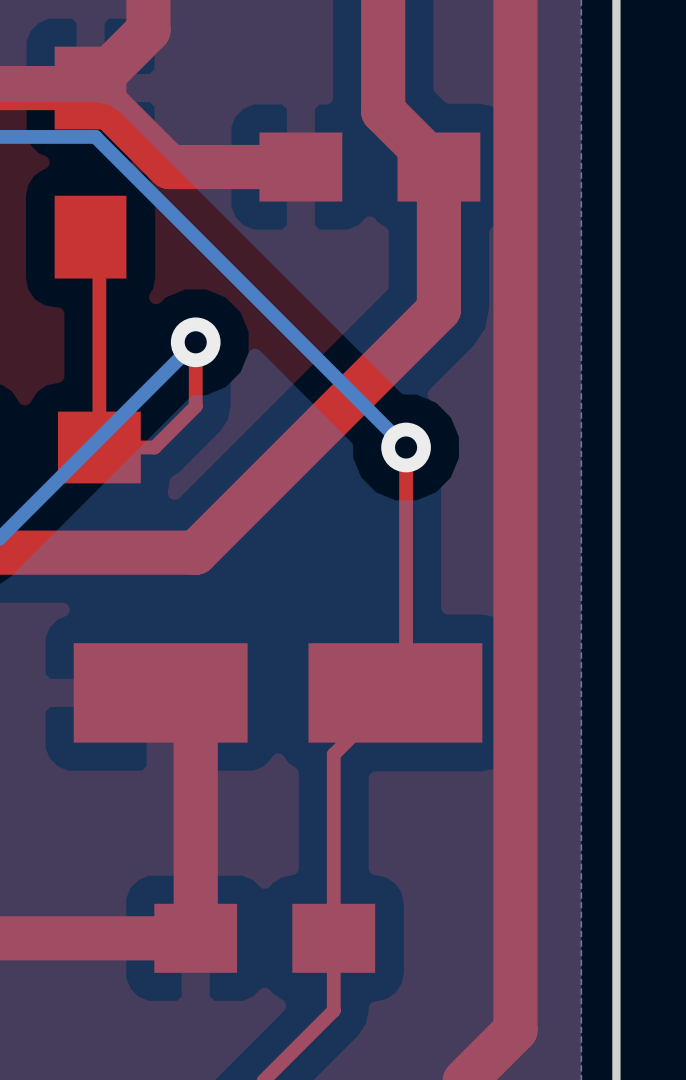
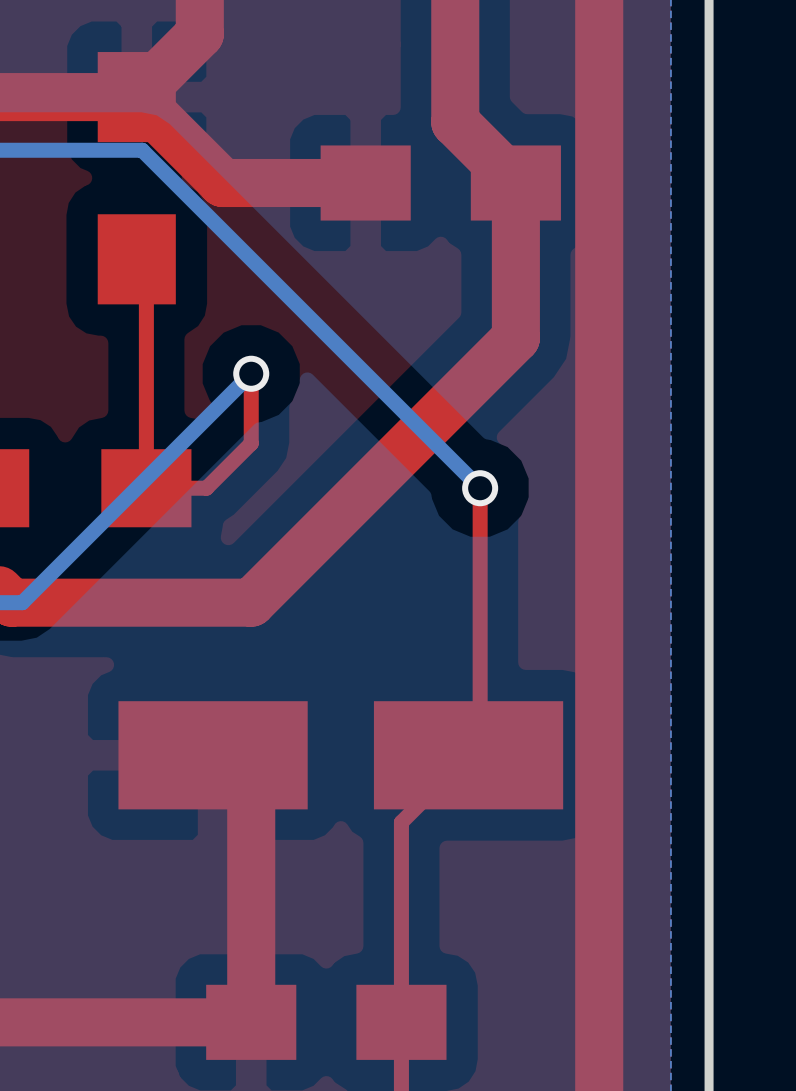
via size: [170, 317, 221, 368] -> [233, 355, 270, 392]
via size: [381, 422, 431, 473] -> [462, 470, 499, 507]

